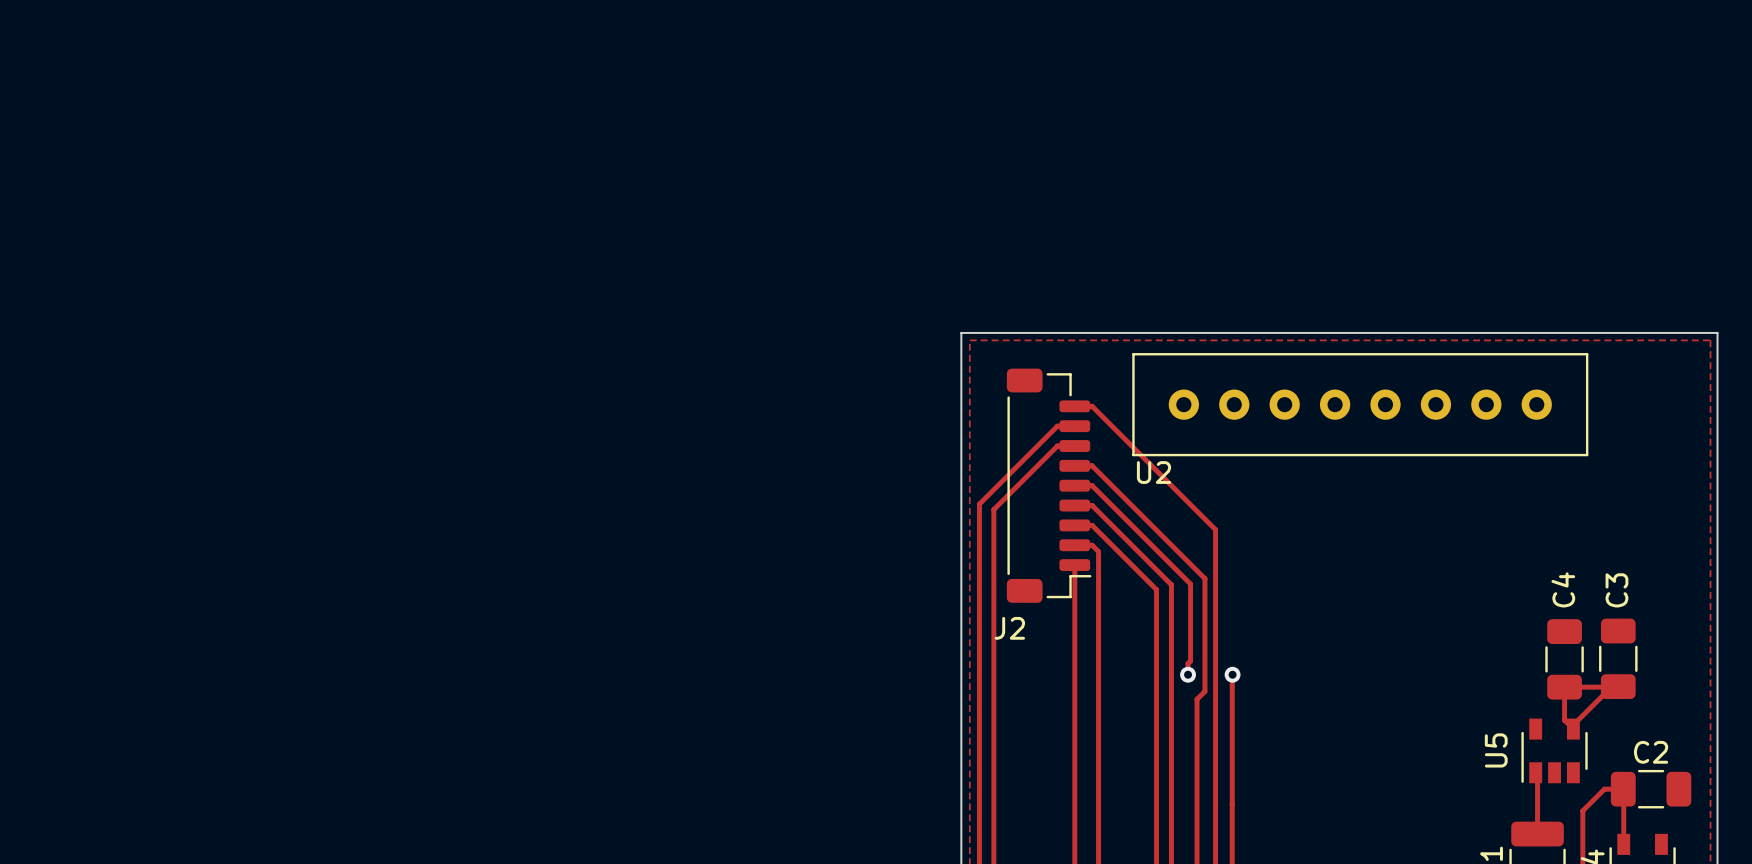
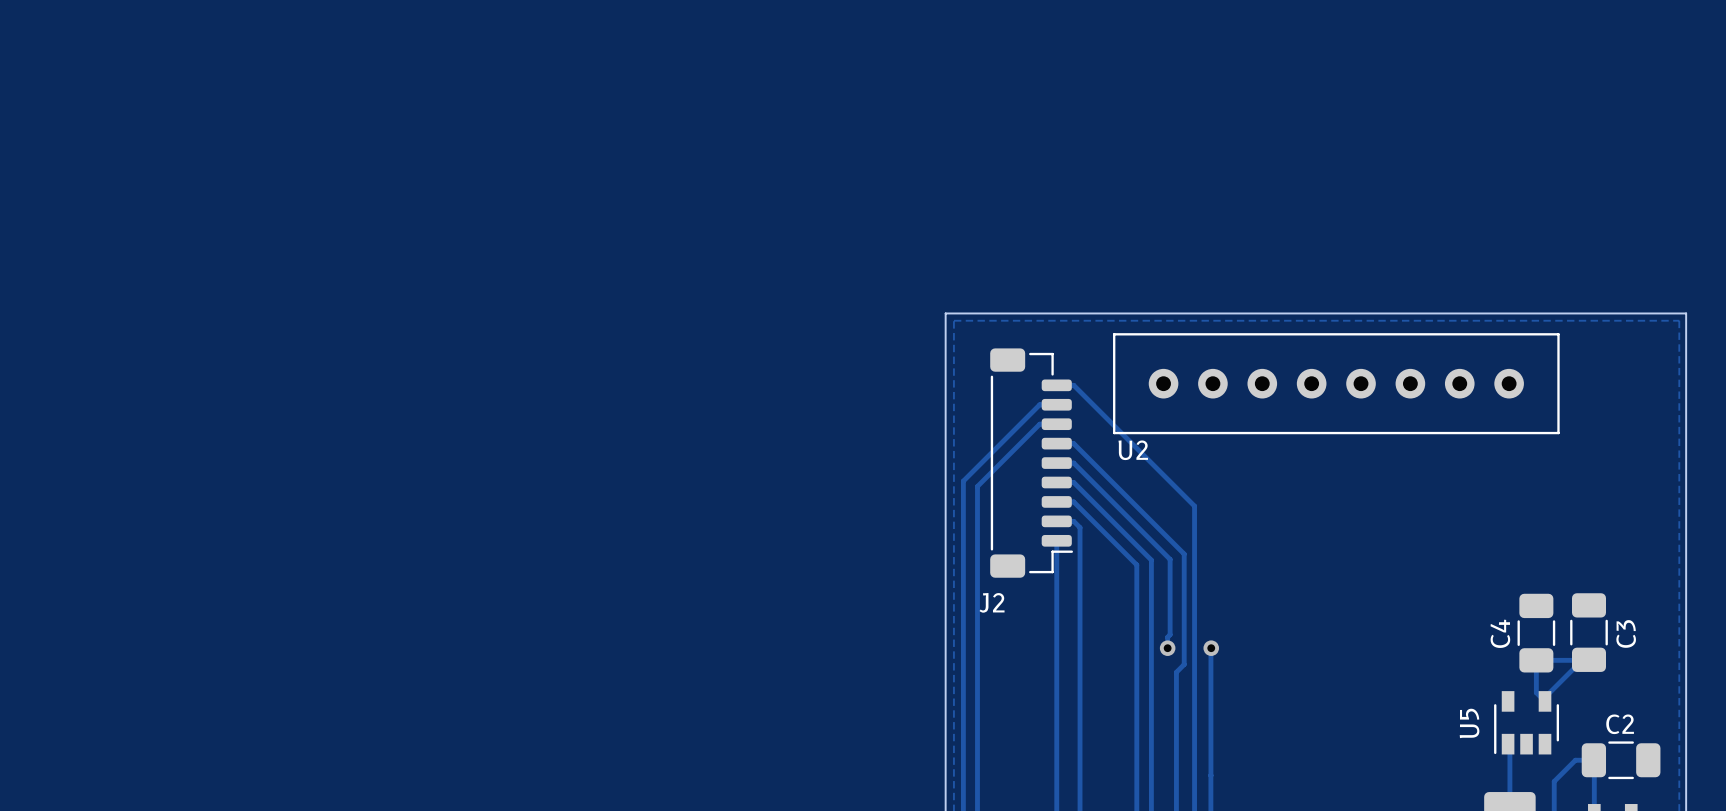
C4 name position: C4 (1563, 589) -> C4 (1500, 633)
C3 name position: C3 (1616, 590) -> C3 (1626, 633)

